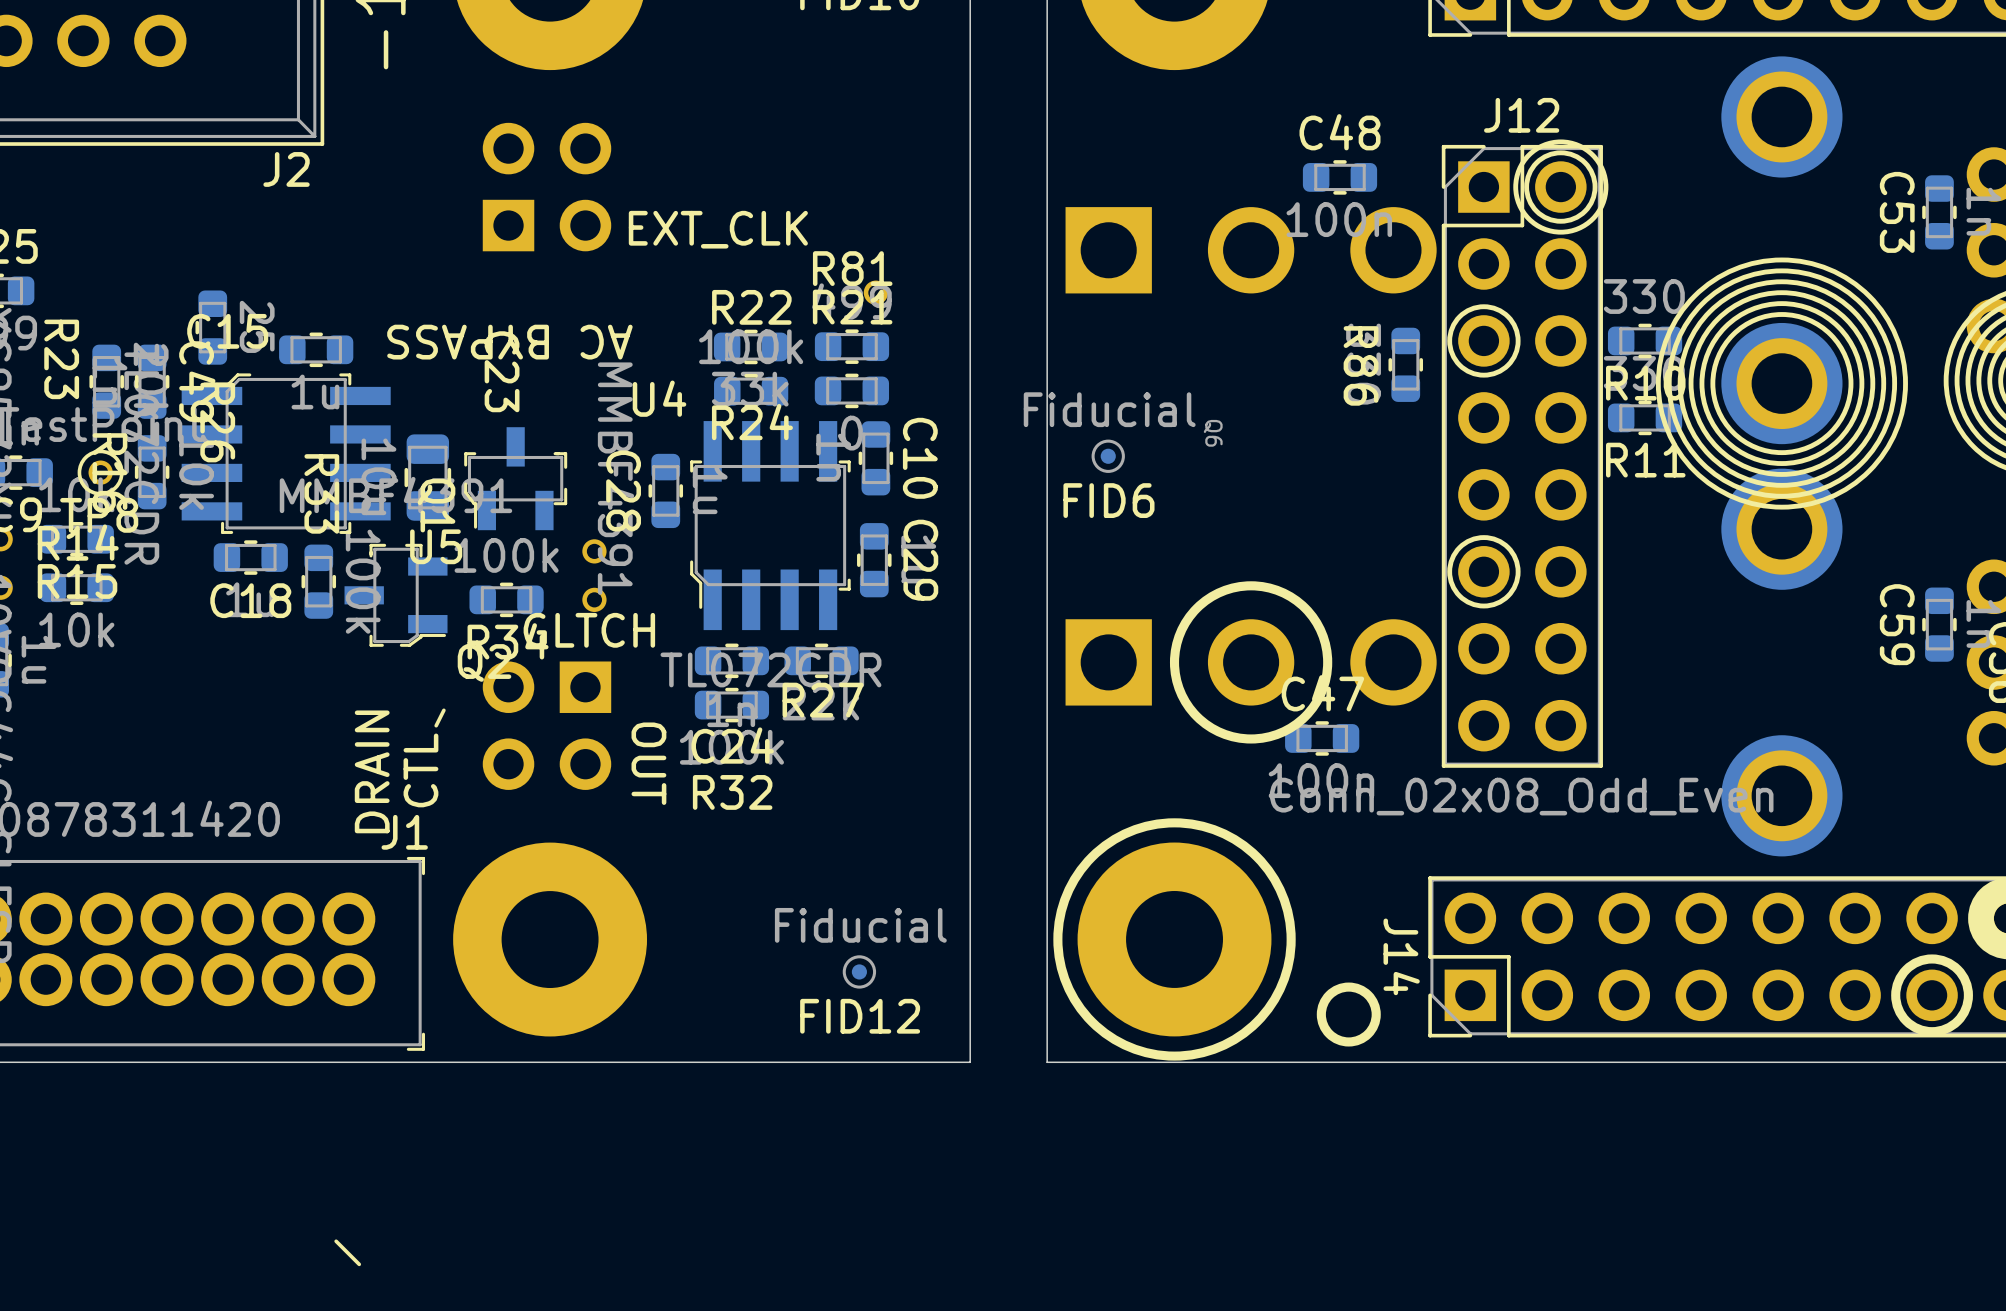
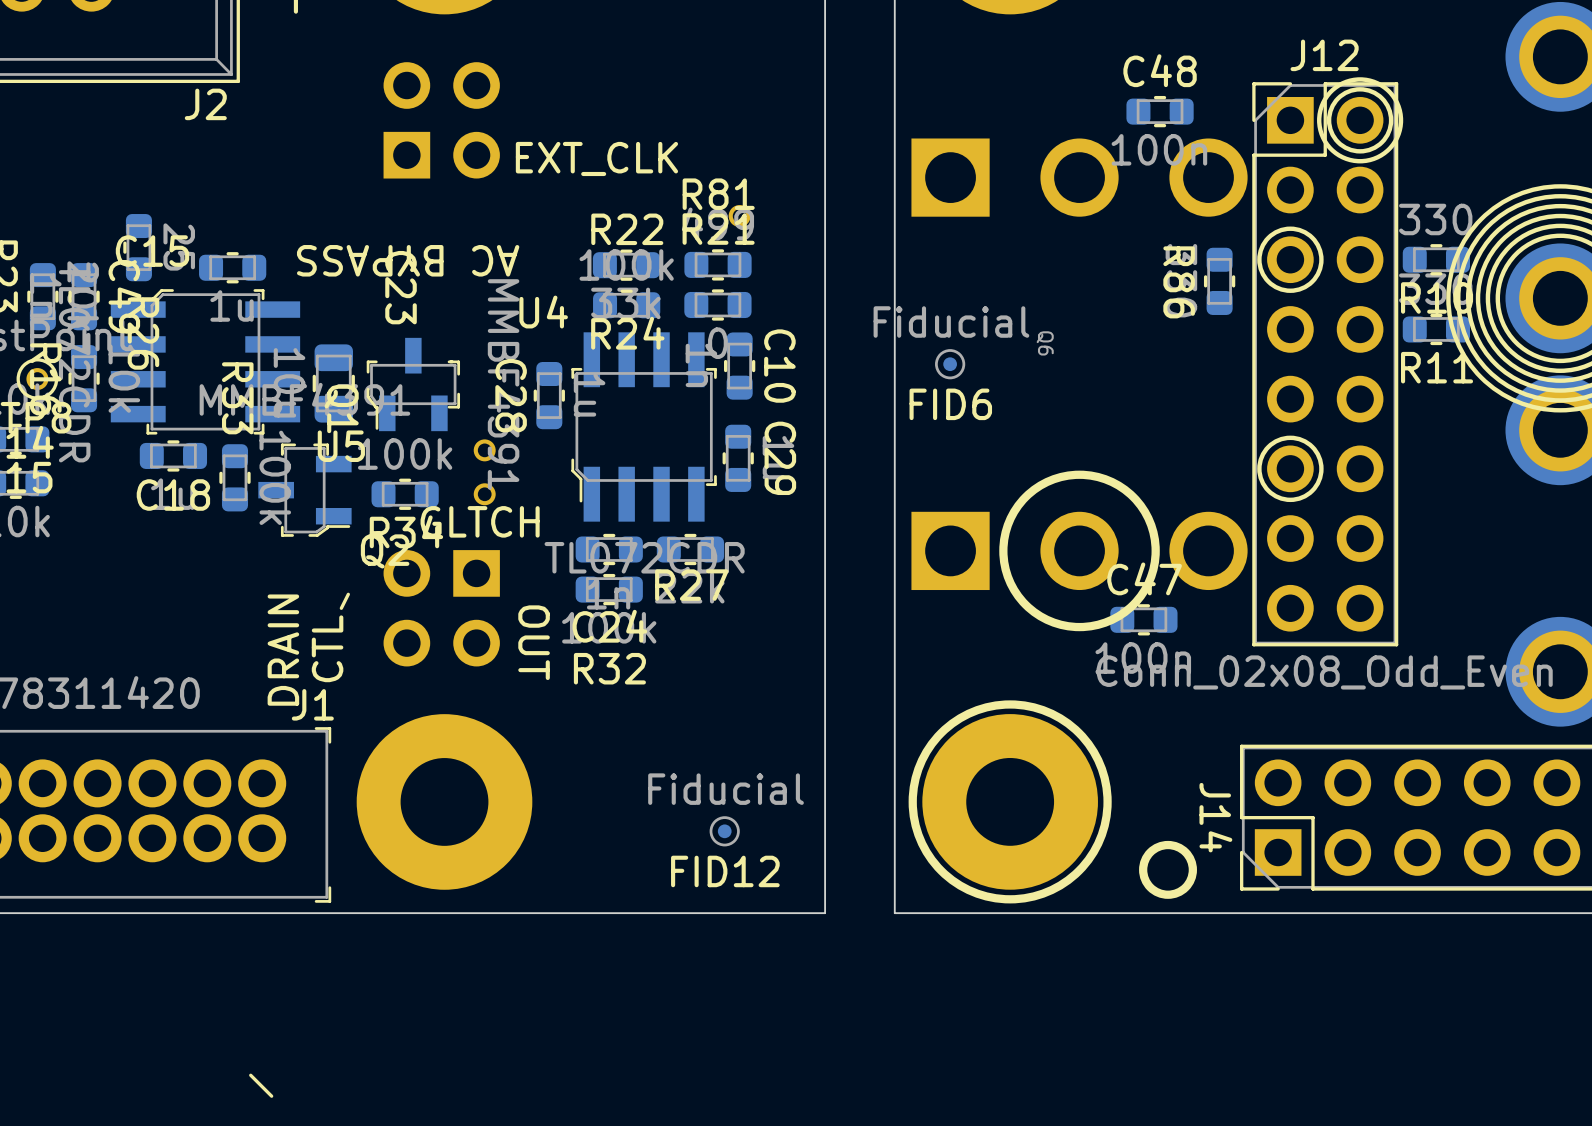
drawing shape: [1169, 581, 1333, 744] -> [999, 470, 1160, 632]
drawing shape: [1053, 818, 1296, 1061] -> [908, 700, 1112, 904]

